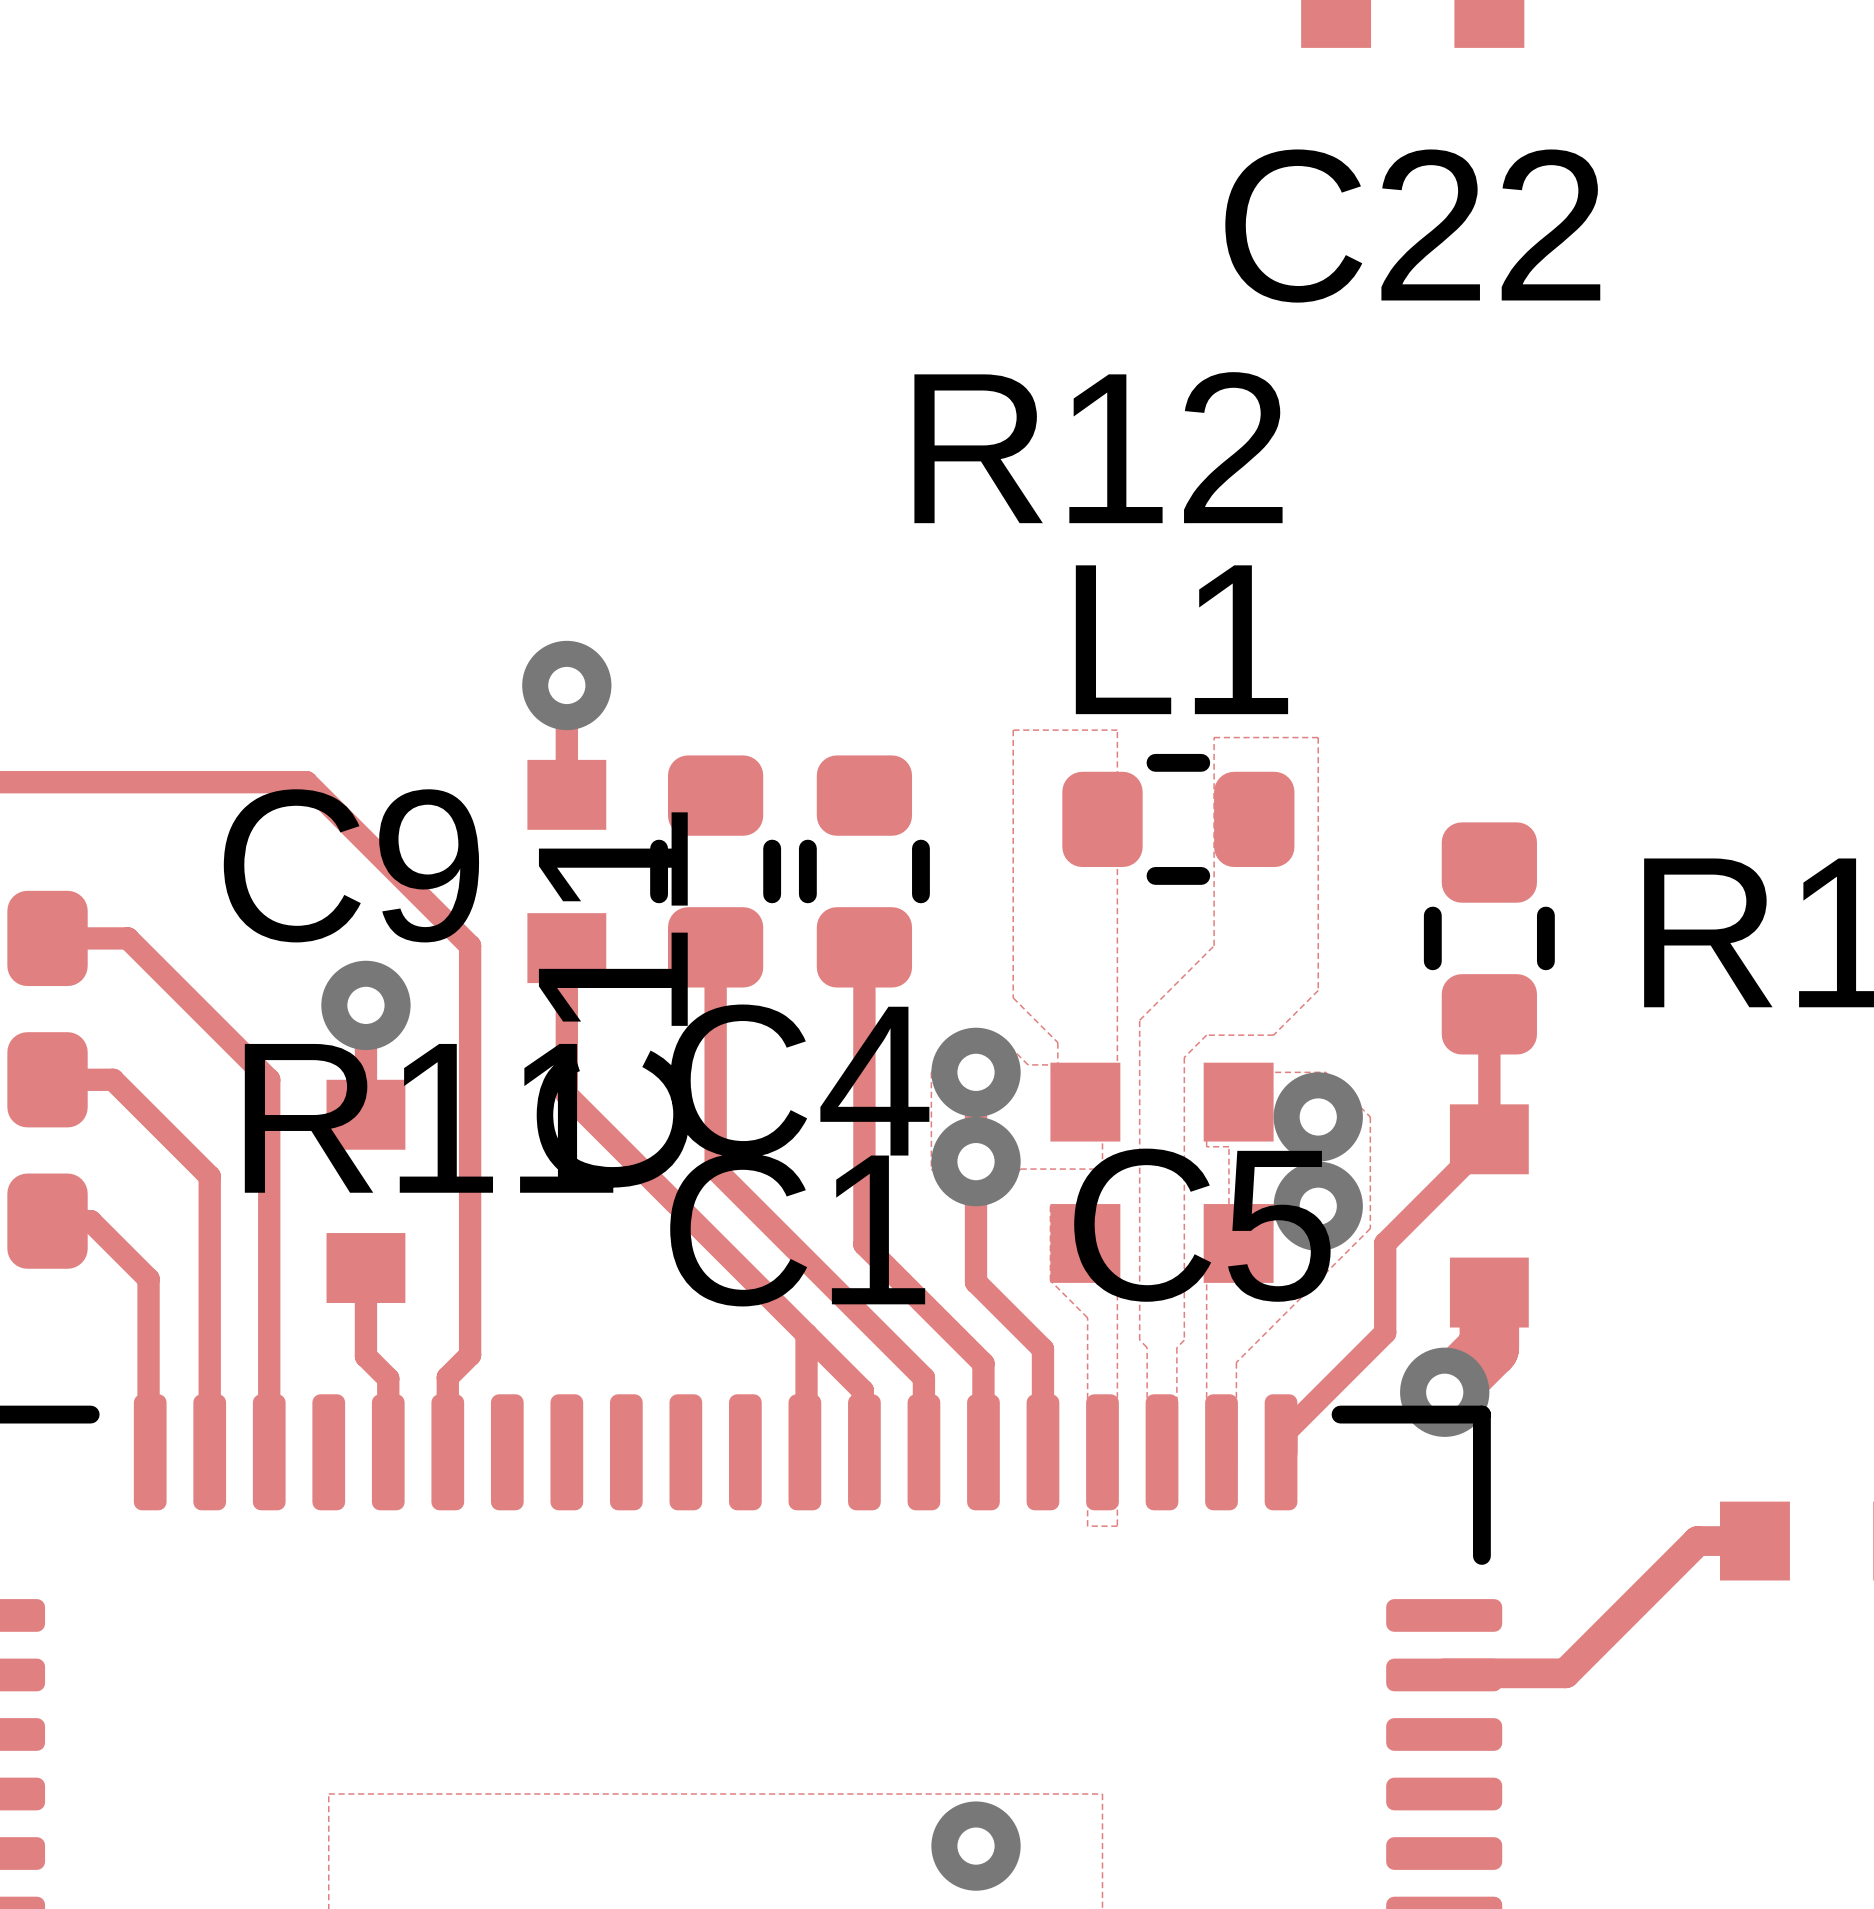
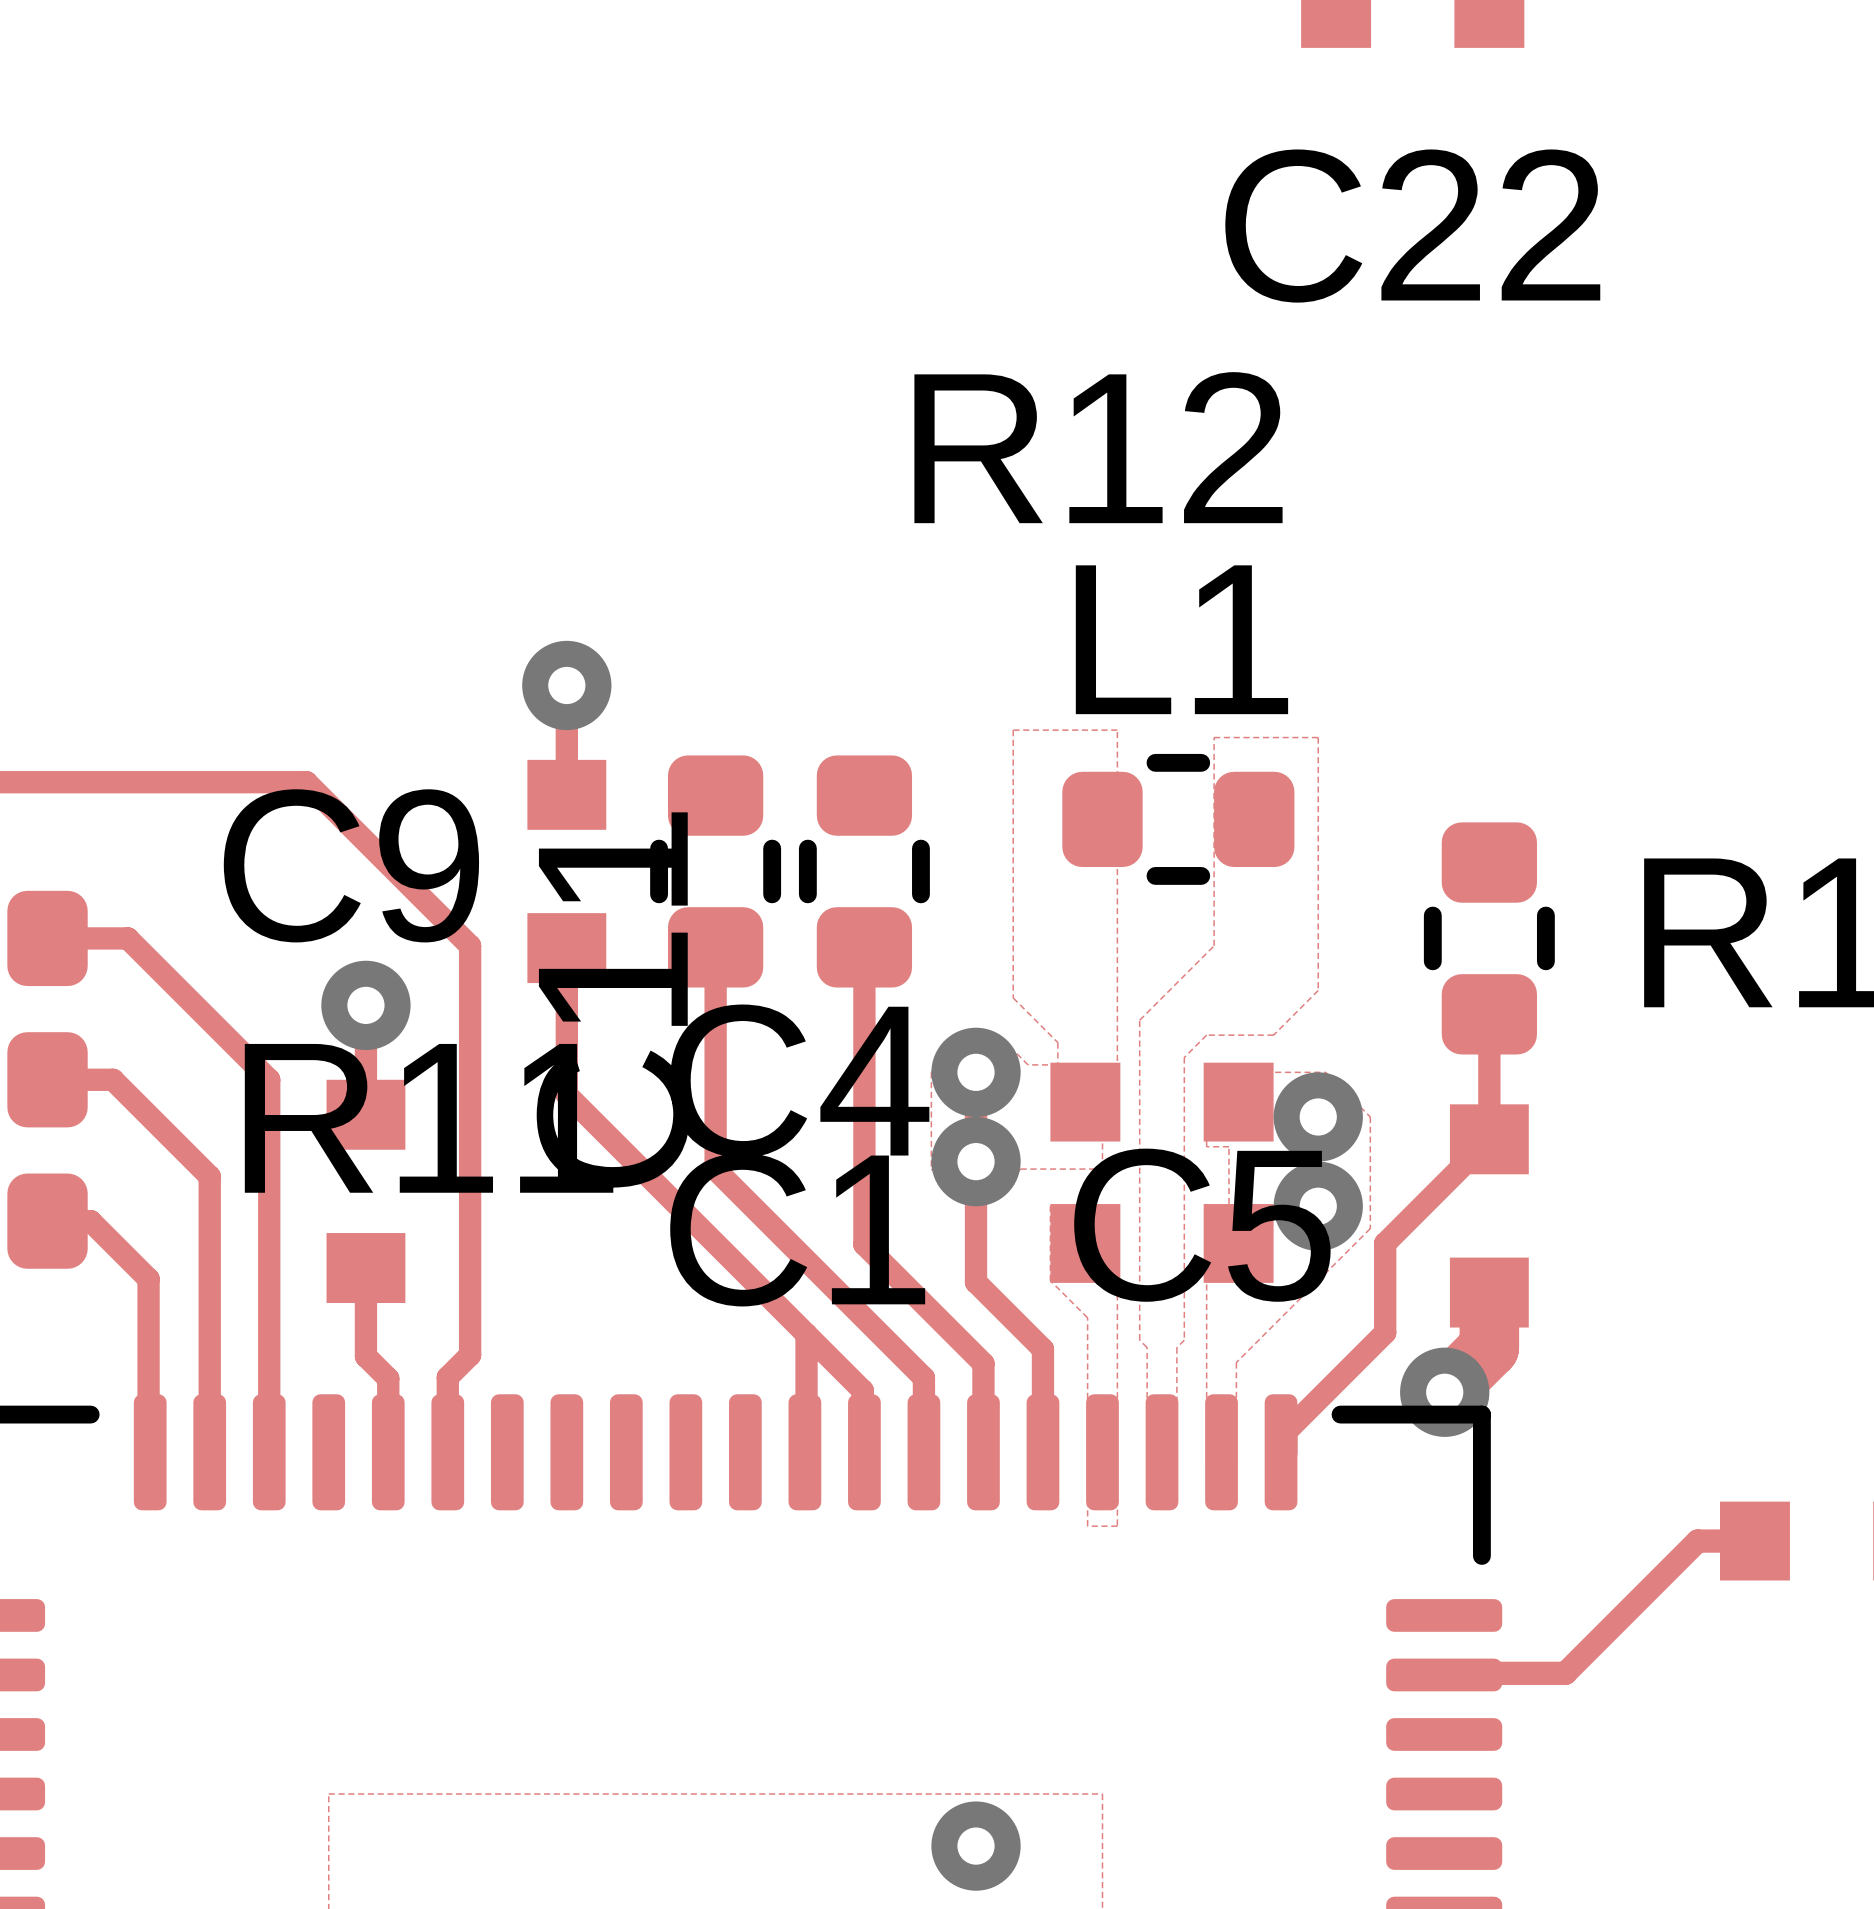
track width: thick (1754, 1541) (1697, 1541) (1565, 1673) (1444, 1673) -> thin (1754, 1541) (1697, 1541) (1565, 1673) (1444, 1673)

